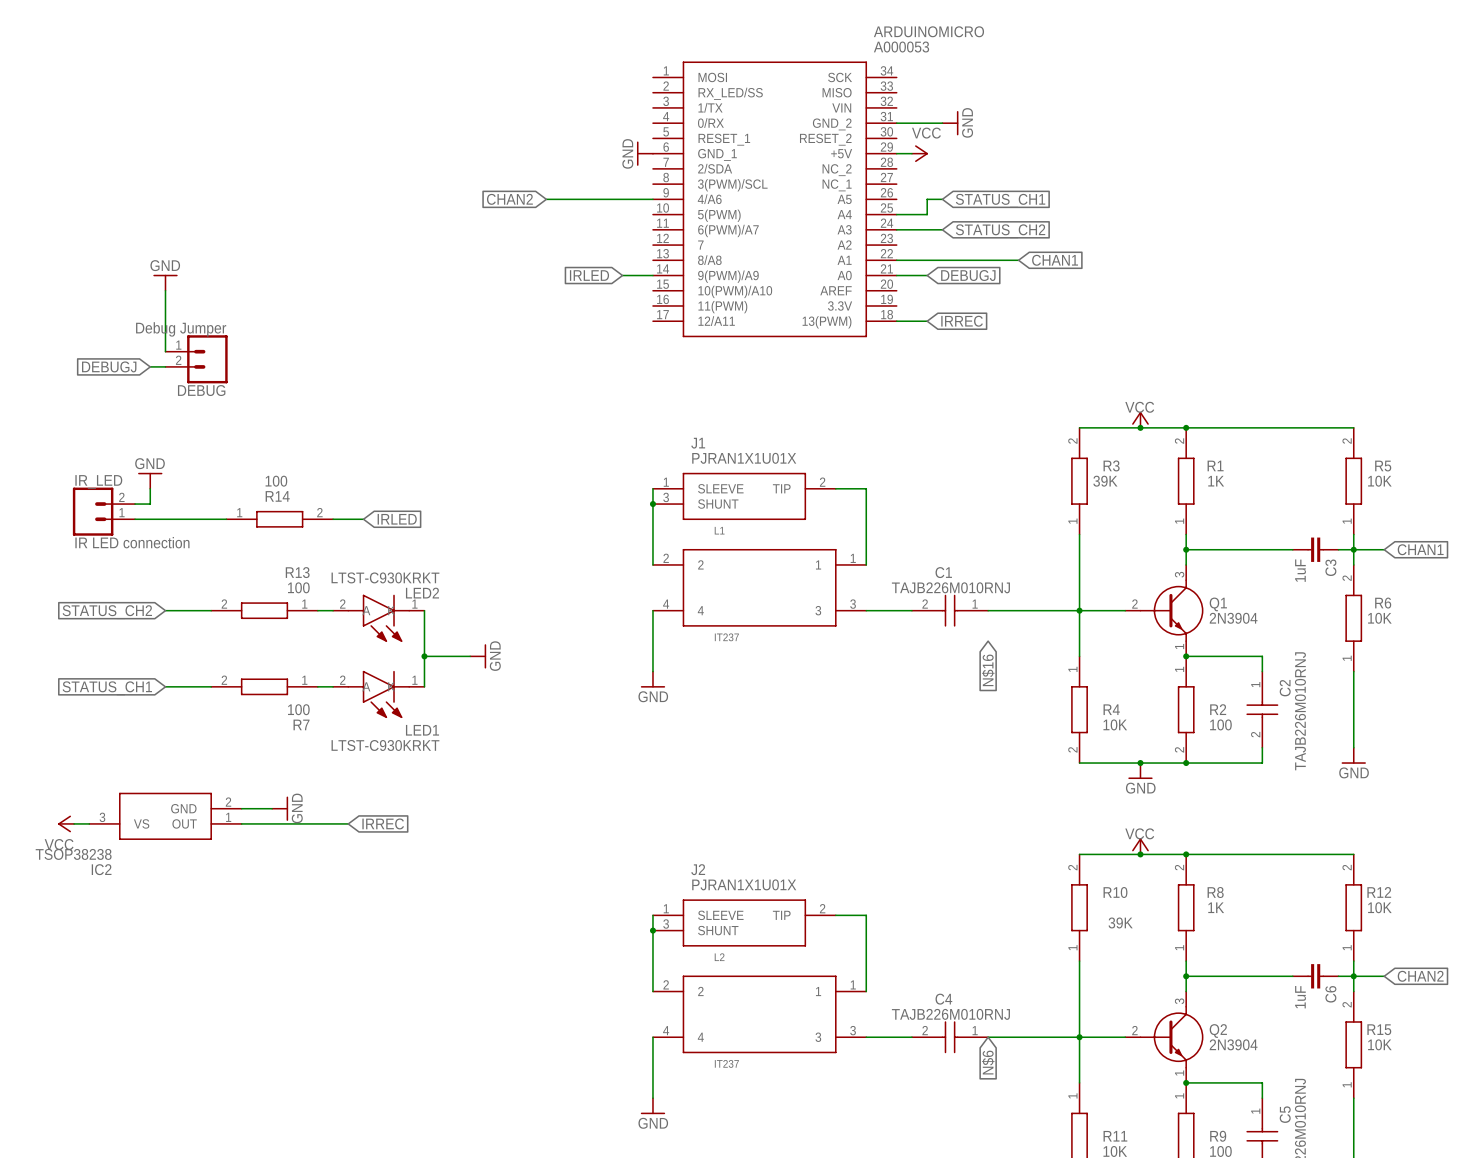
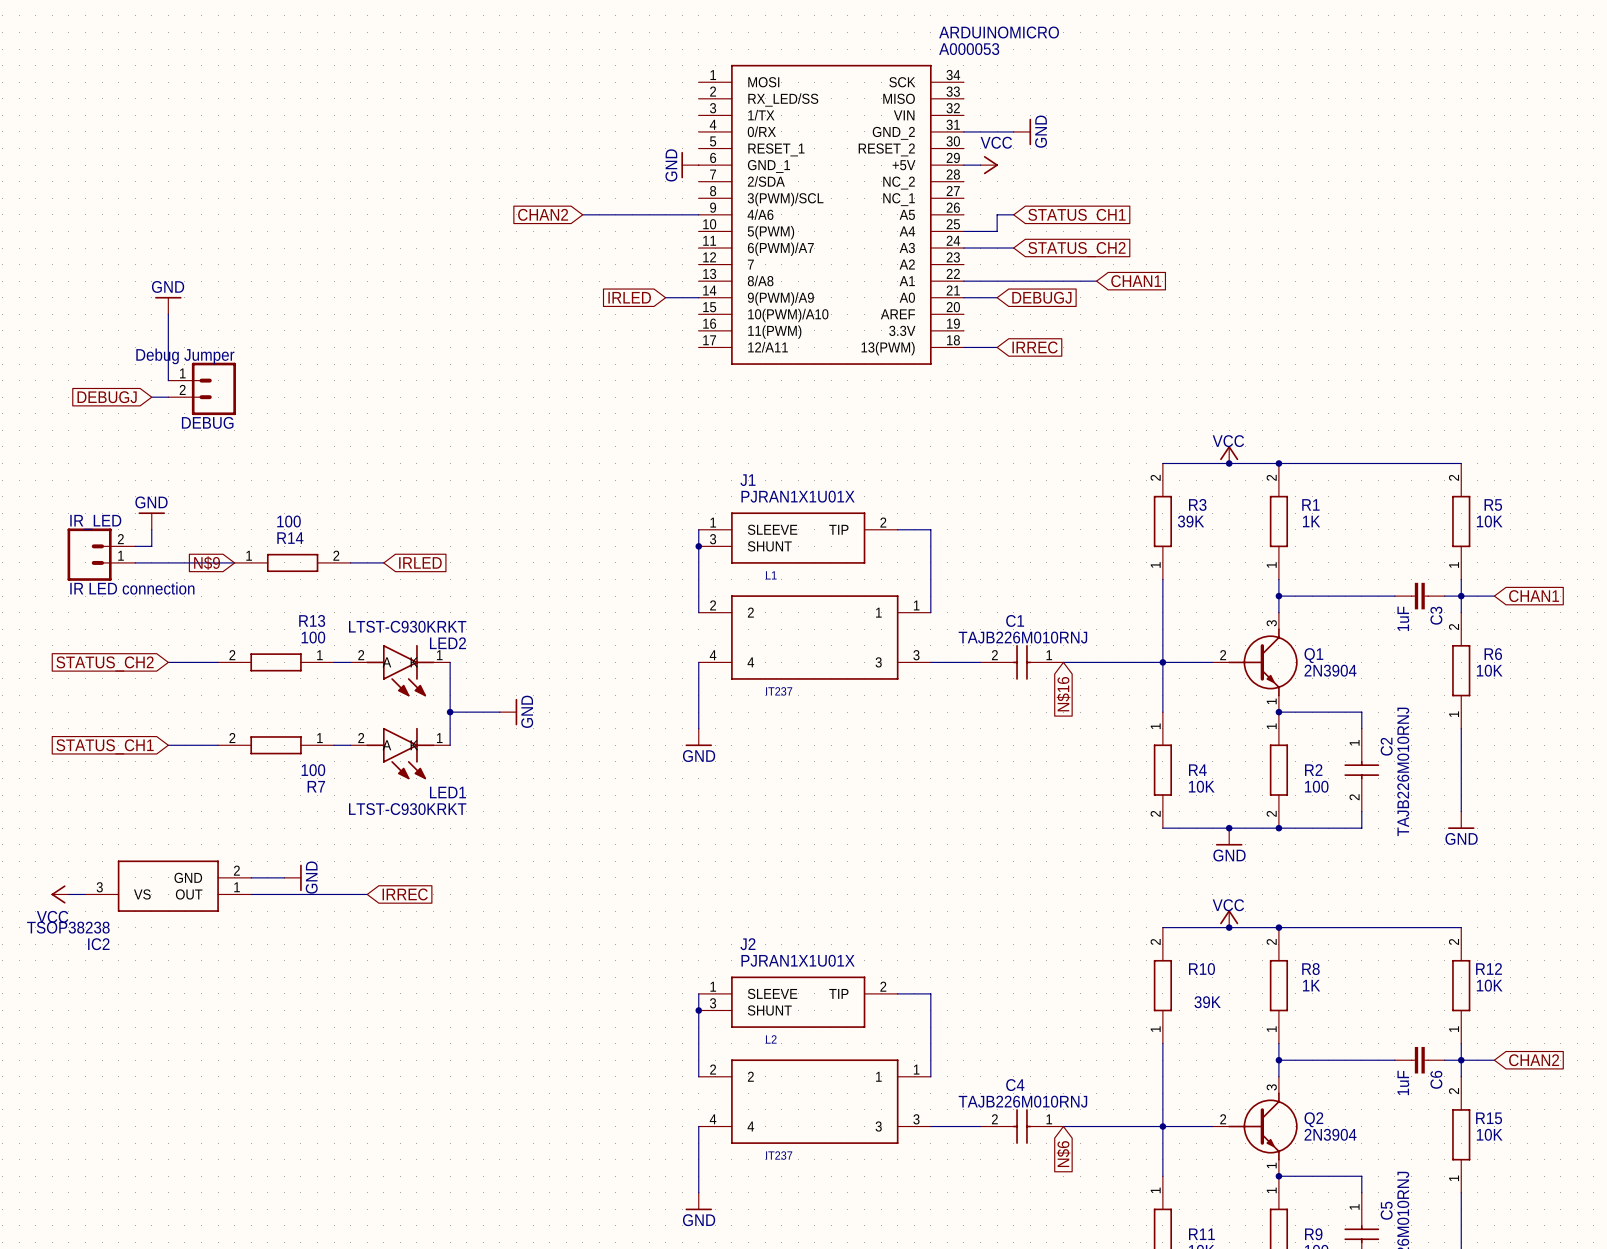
global label: none -> N$9 (207, 563)
global label position: N$16 (988, 670) -> N$16 (1063, 694)

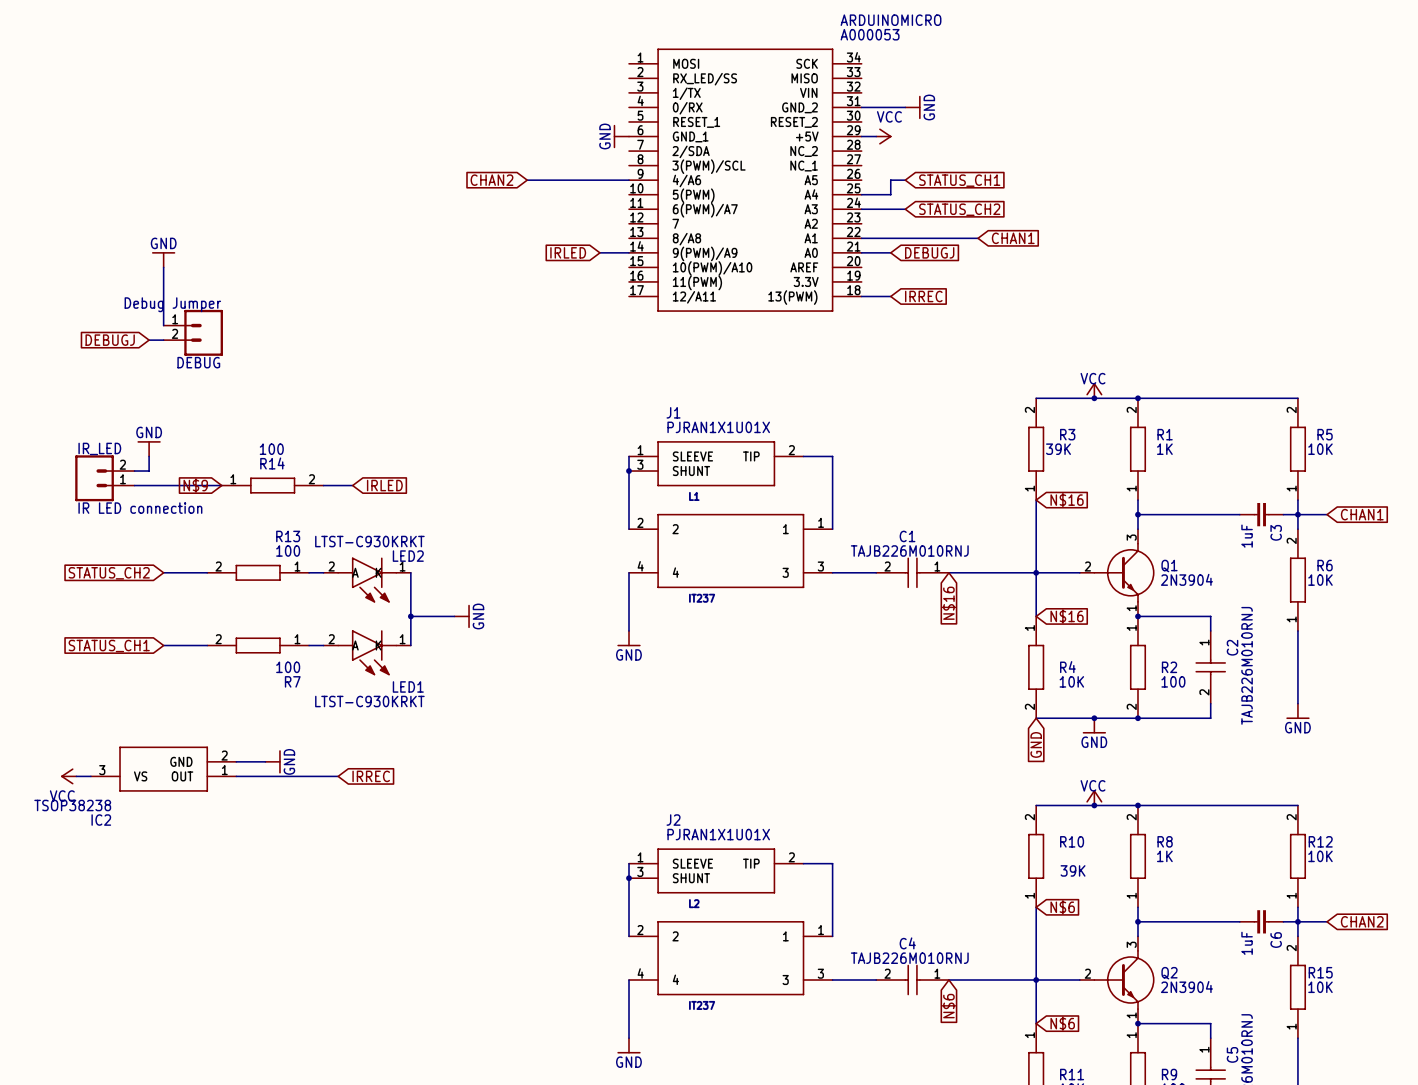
global label: none -> N$16 (1067, 500)
global label: none -> N$16 (1067, 616)
global label: none -> GND (1036, 744)
global label: none -> N$6 (1062, 907)
global label: none -> N$6 (1062, 1023)

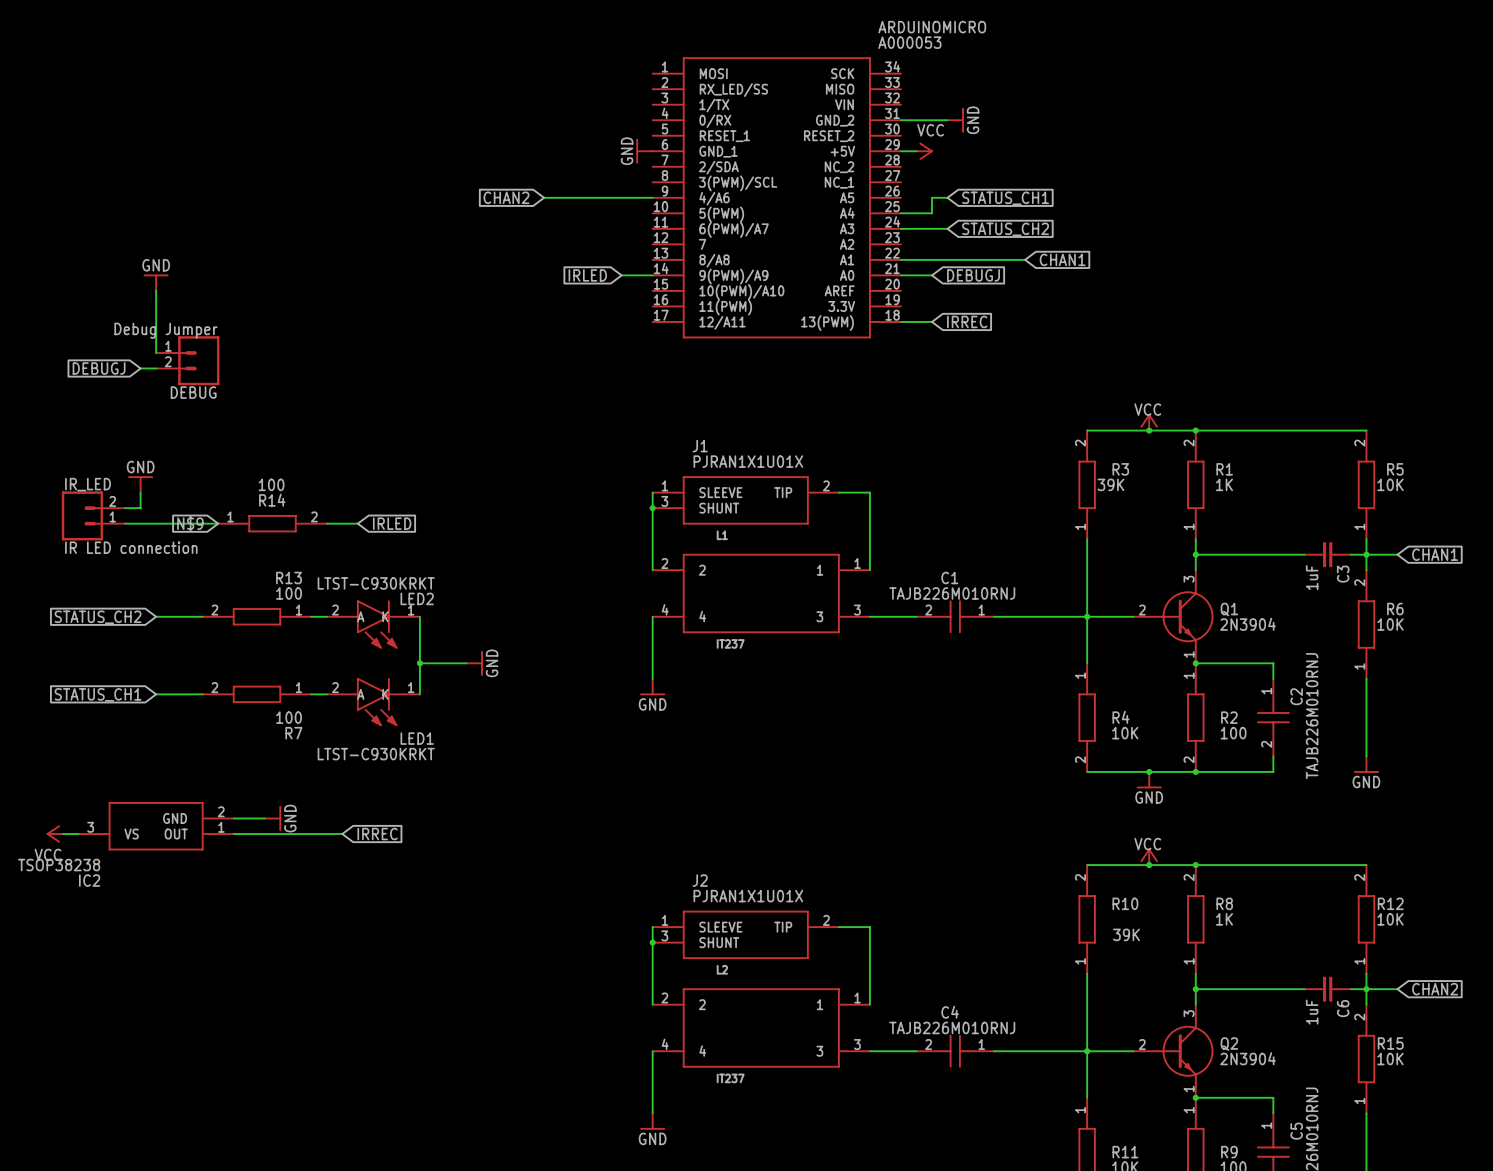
global label: N$16 (1067, 500) -> none
global label: N$16 (948, 603) -> none
global label: N$16 (1067, 616) -> none
global label: GND (1036, 744) -> none
global label: N$6 (1062, 907) -> none
global label: N$6 (948, 1006) -> none
global label: N$6 (1062, 1023) -> none

